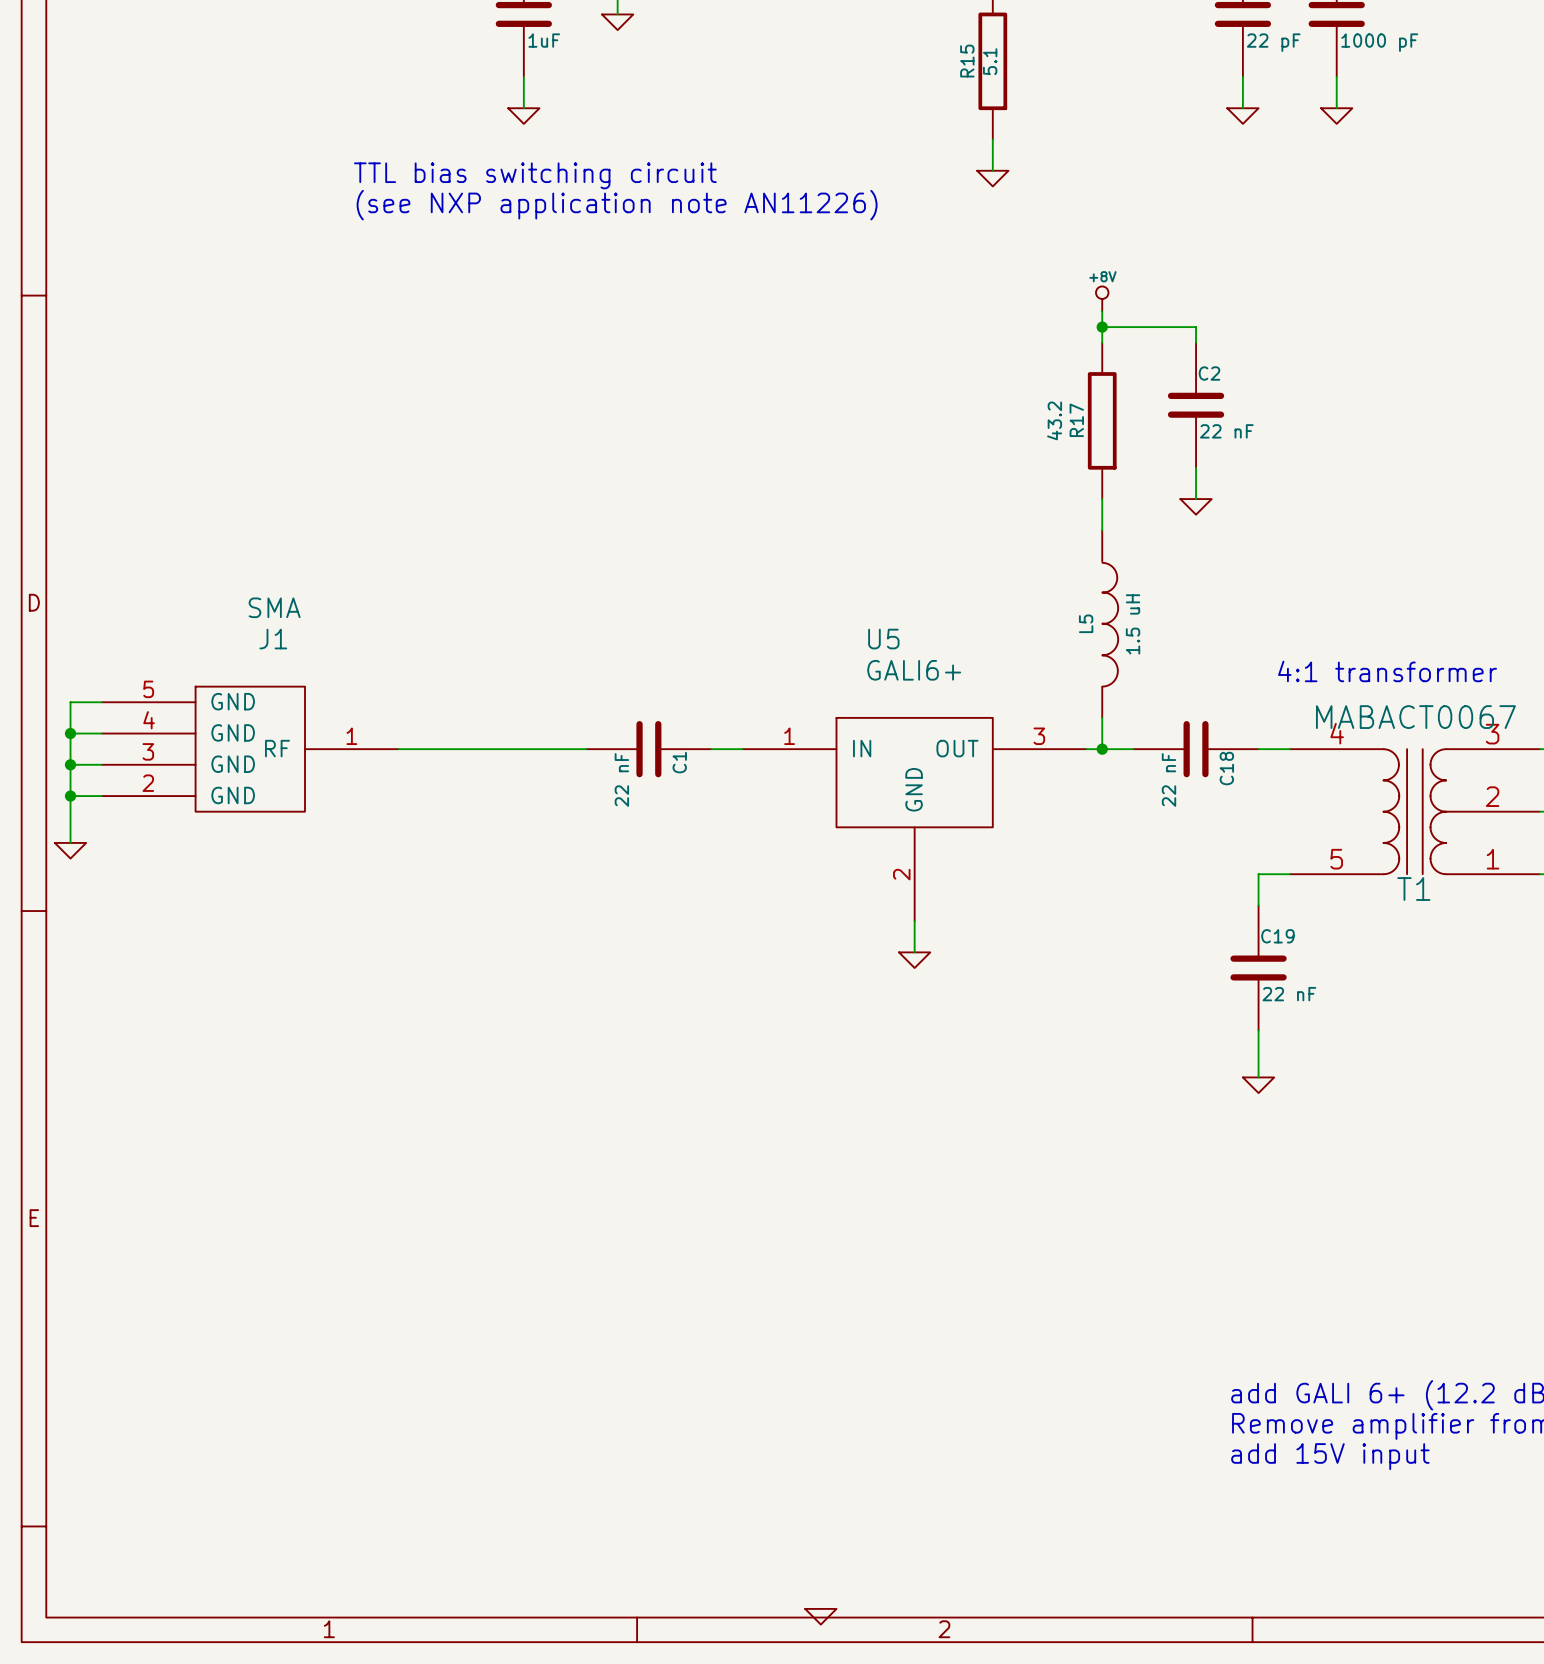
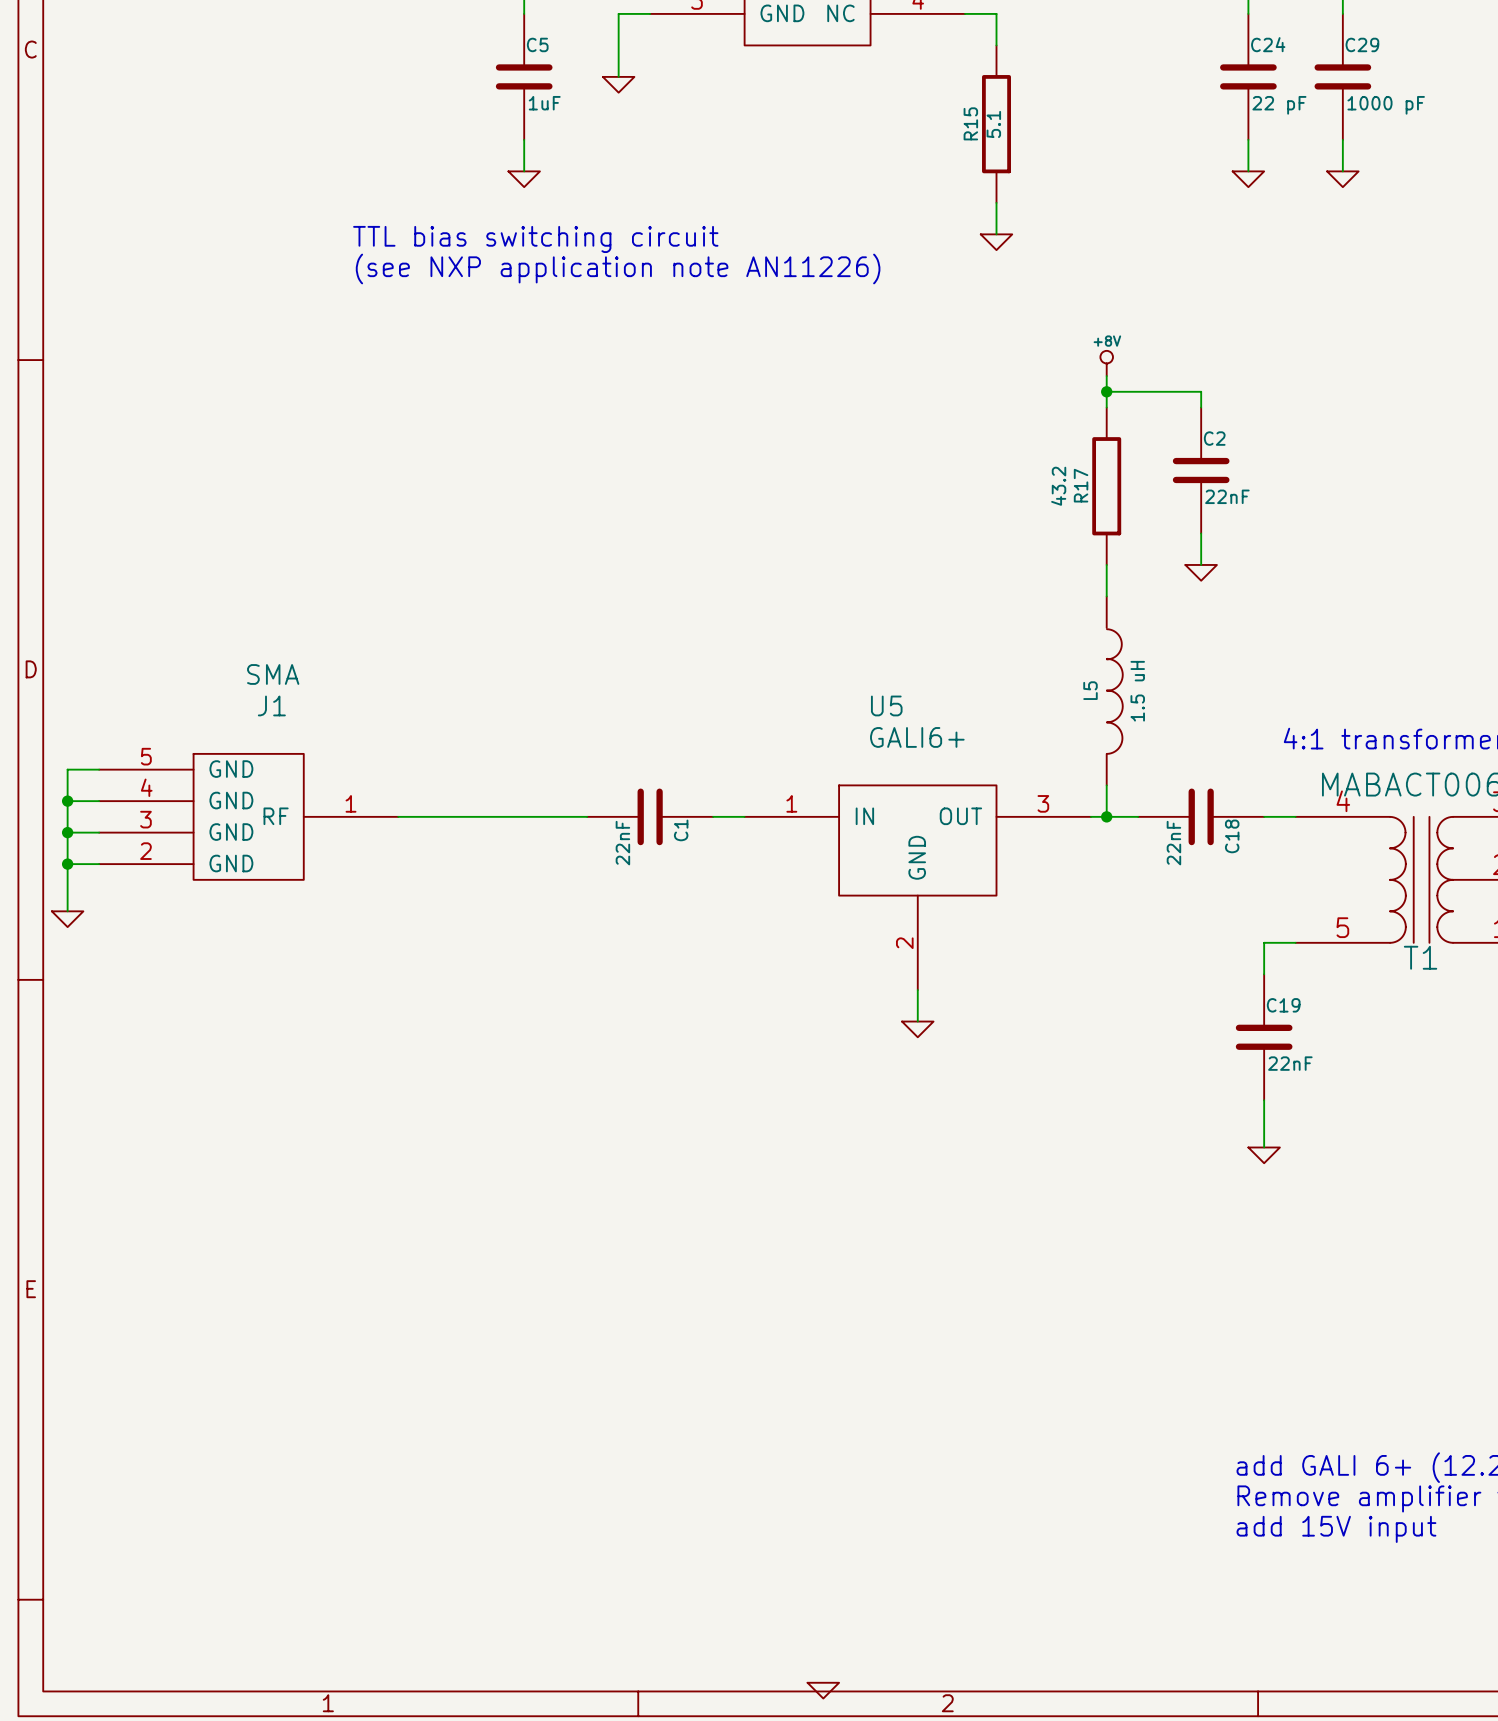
C2 value: 22 nF (1226, 431) -> 22nF (1227, 496)
C1 value: 22 nF (621, 779) -> 22nF (622, 843)
C18 value: 22 nF (1168, 779) -> 22nF (1173, 843)
C19 value: 22 nF (1289, 994) -> 22nF (1290, 1063)

